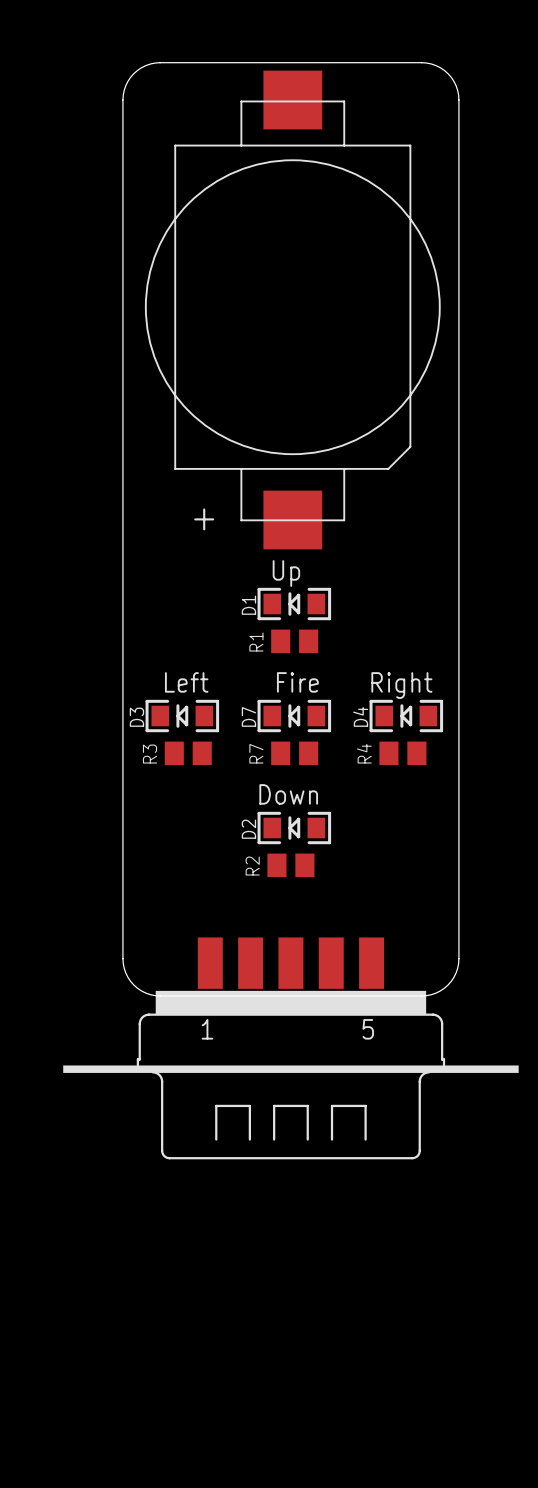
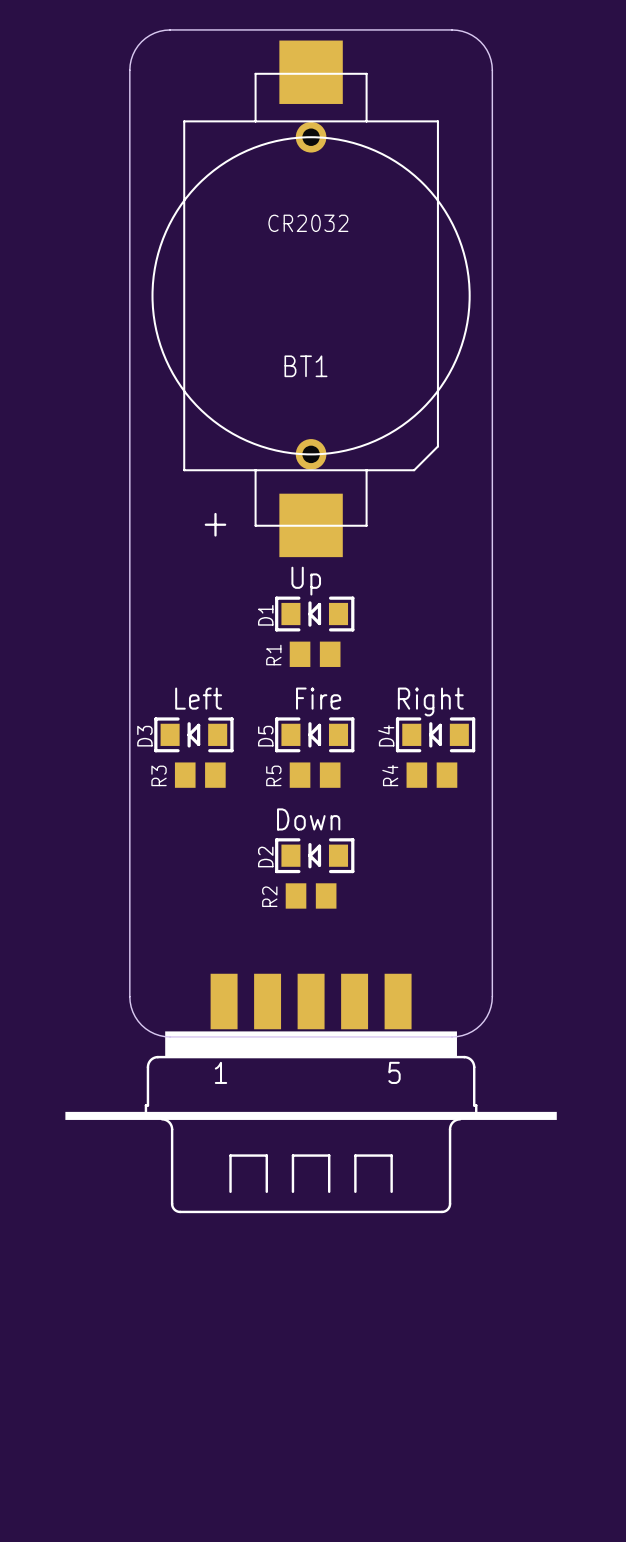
part: (292, 310) -> none
BT1: none -> CR2032 (311, 298)
D7 name: D7 (248, 716) -> D5 (265, 736)
R7 name: R7 (256, 753) -> R5 (273, 775)

